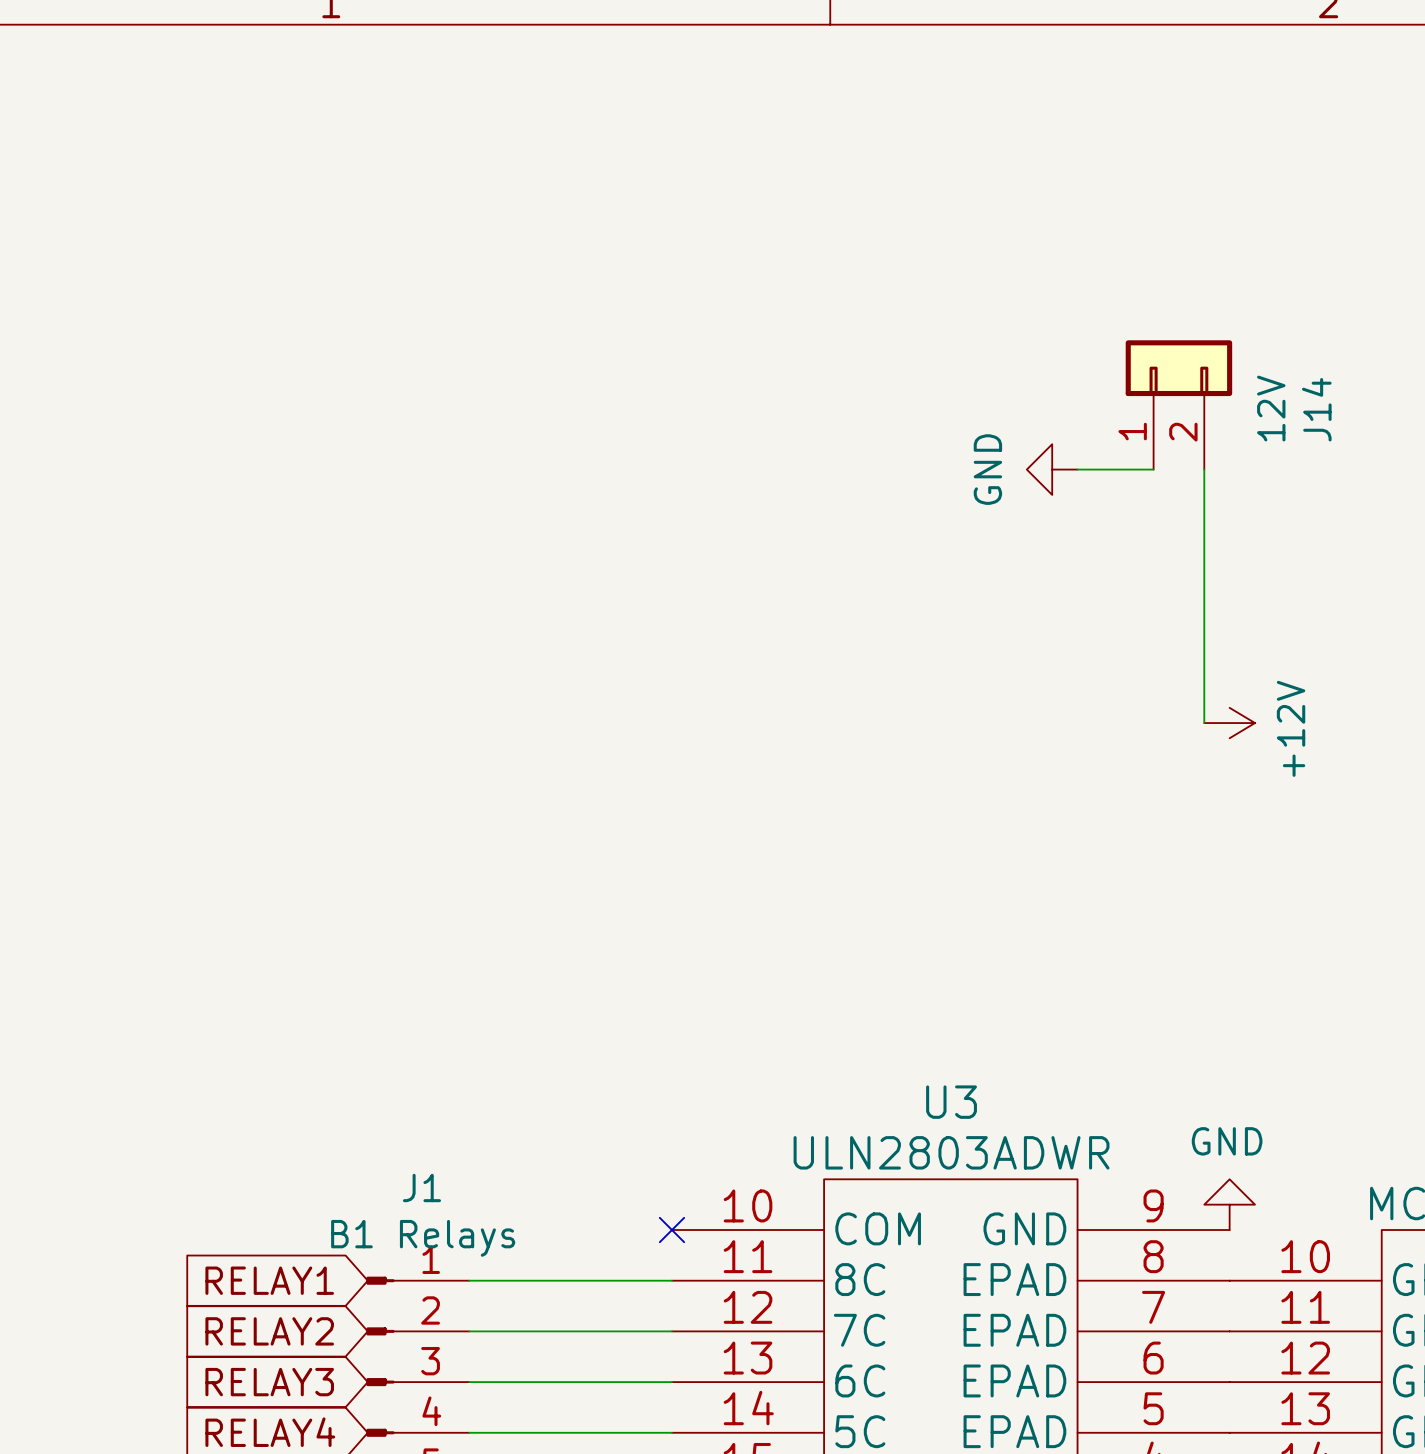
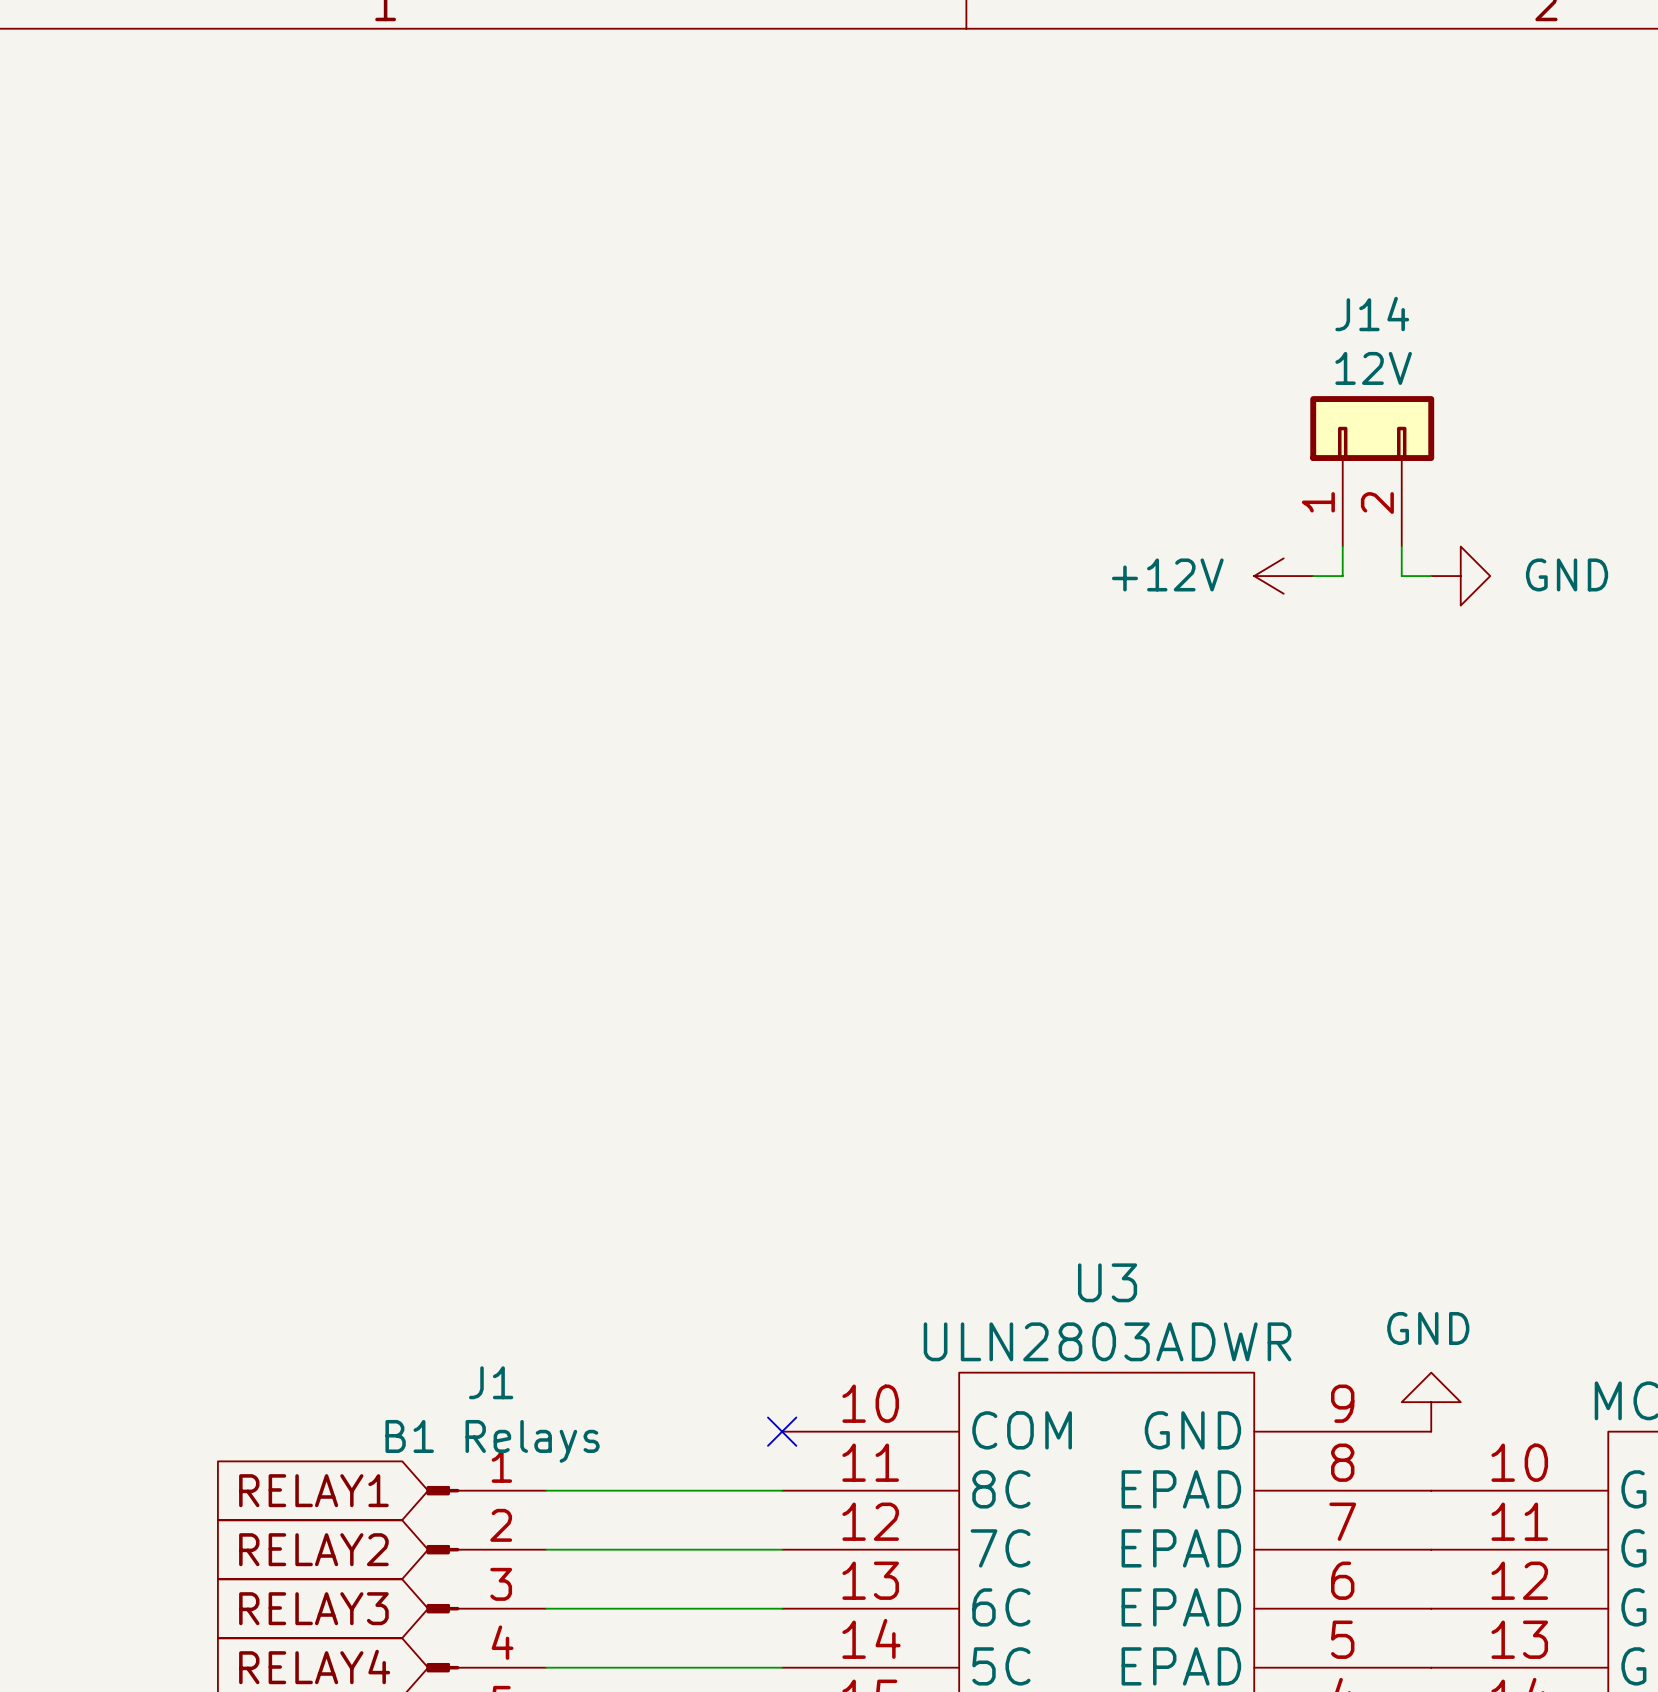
J14 value rotation: 0° (1271, 408) -> 90° clockwise (1373, 368)
J14 value position: 12V (1271, 408) -> 12V (1373, 368)
J14 name rotation: 0° (1316, 409) -> 90° clockwise (1372, 314)
J14 name position: J14 (1316, 409) -> J14 (1372, 314)
power symbol rotation: 0° (1052, 469) -> 180° (1460, 576)
power symbol position: GND (1052, 469) -> GND (1460, 576)
wire: (1077, 469) (1153, 469) -> (1313, 576) (1342, 576) (1342, 546)
wire: (1204, 494) (1204, 723) -> (1401, 576) (1431, 576)
power symbol rotation: 0° (1229, 723) -> 180° (1283, 576)
power symbol position: +12V (1229, 723) -> +12V (1283, 576)

